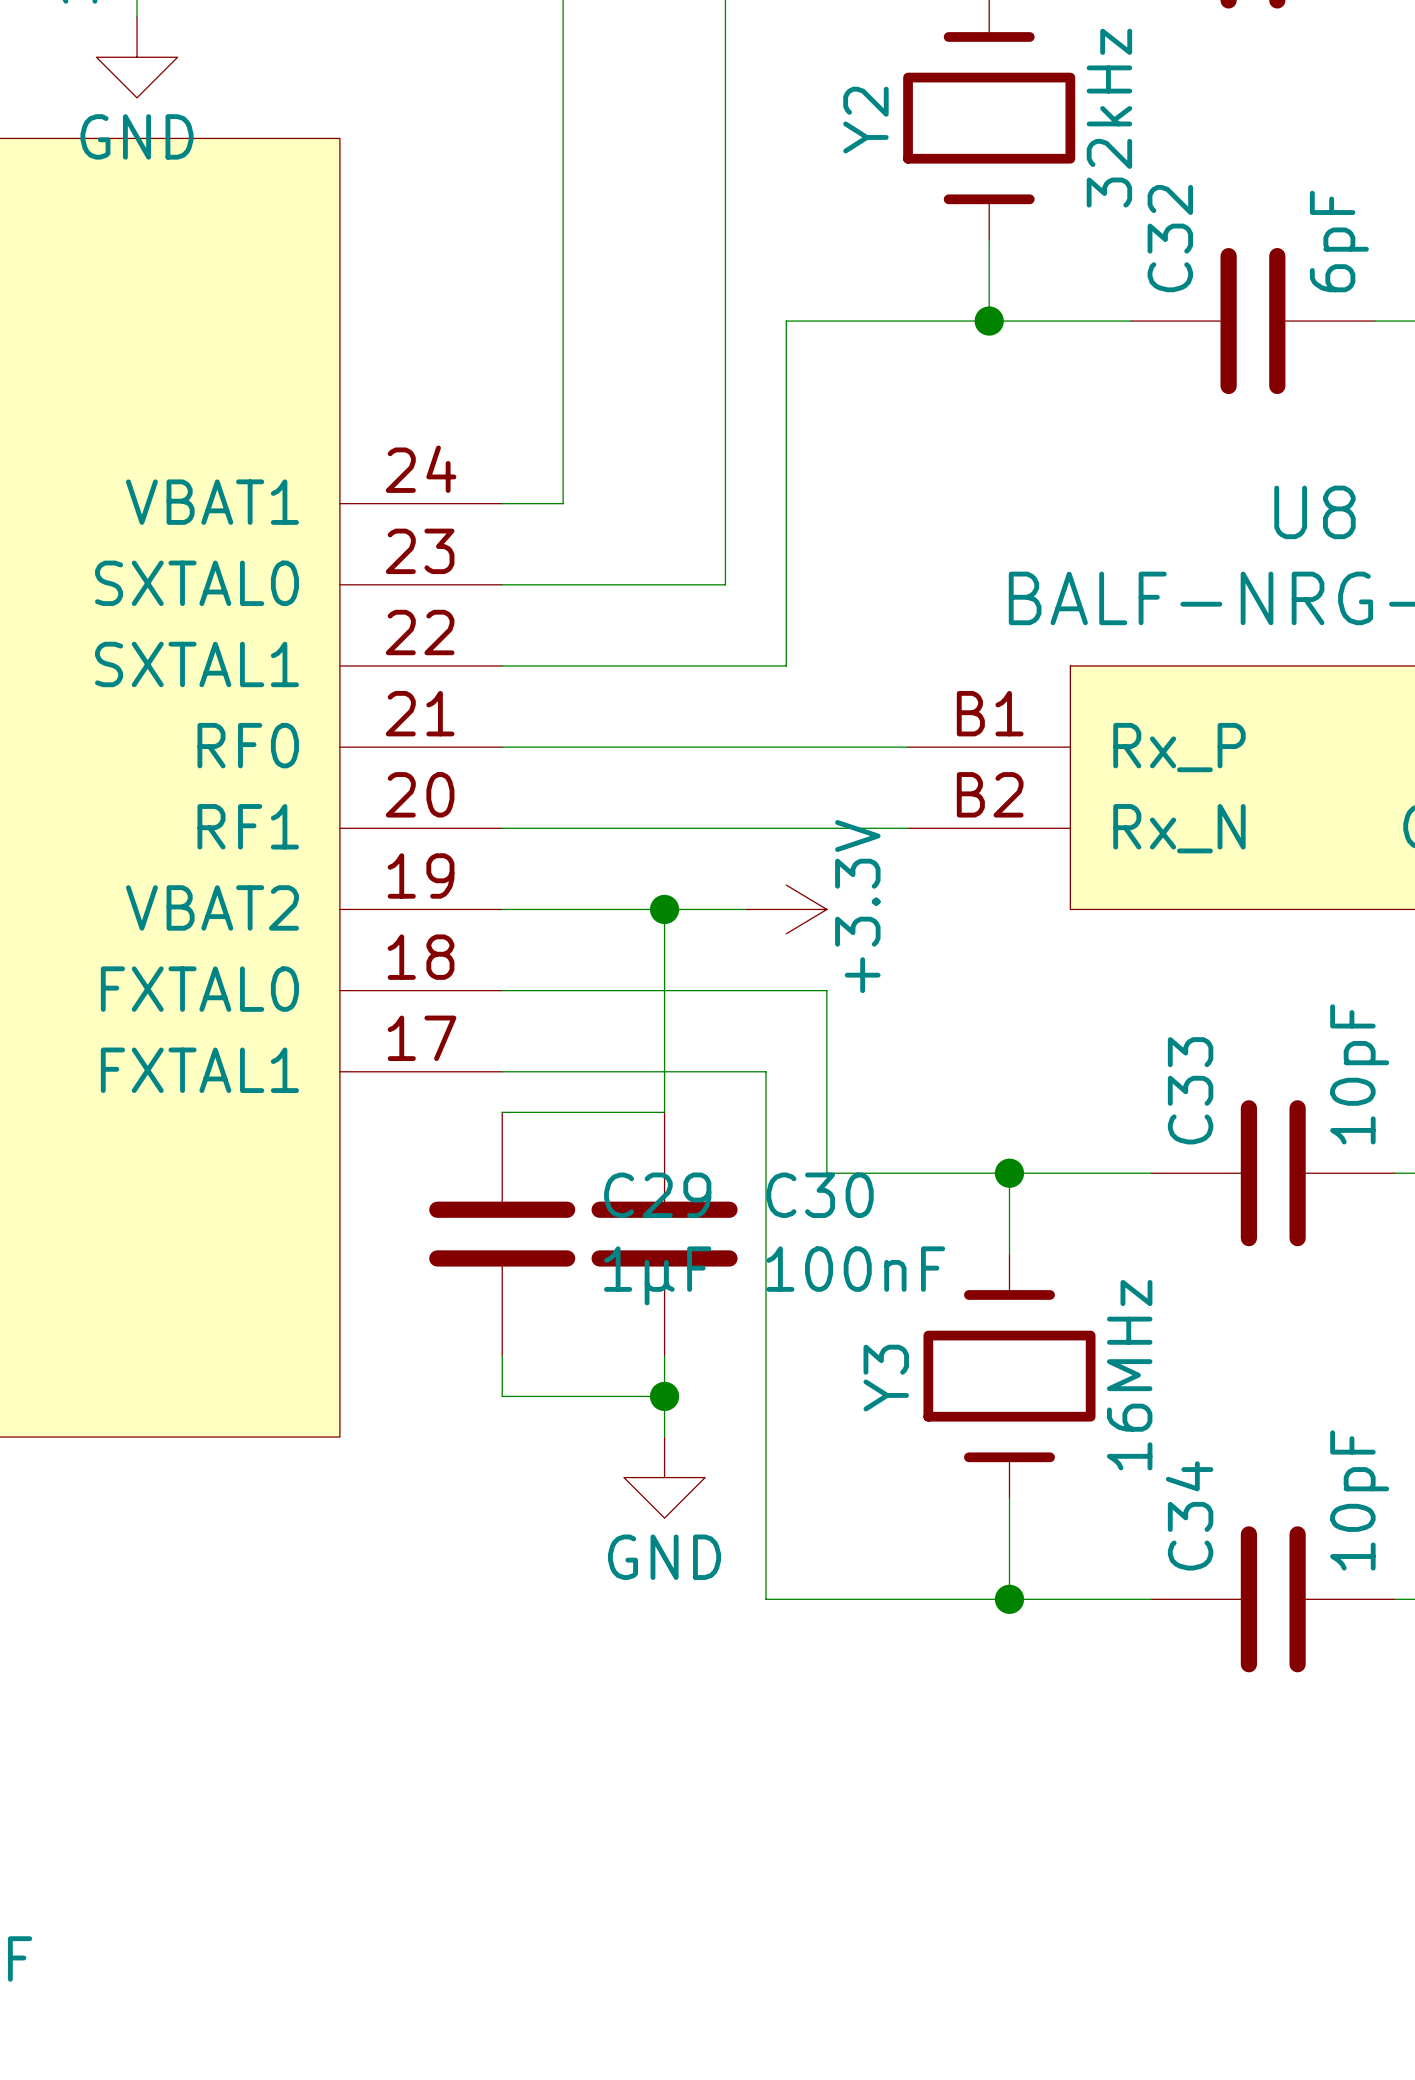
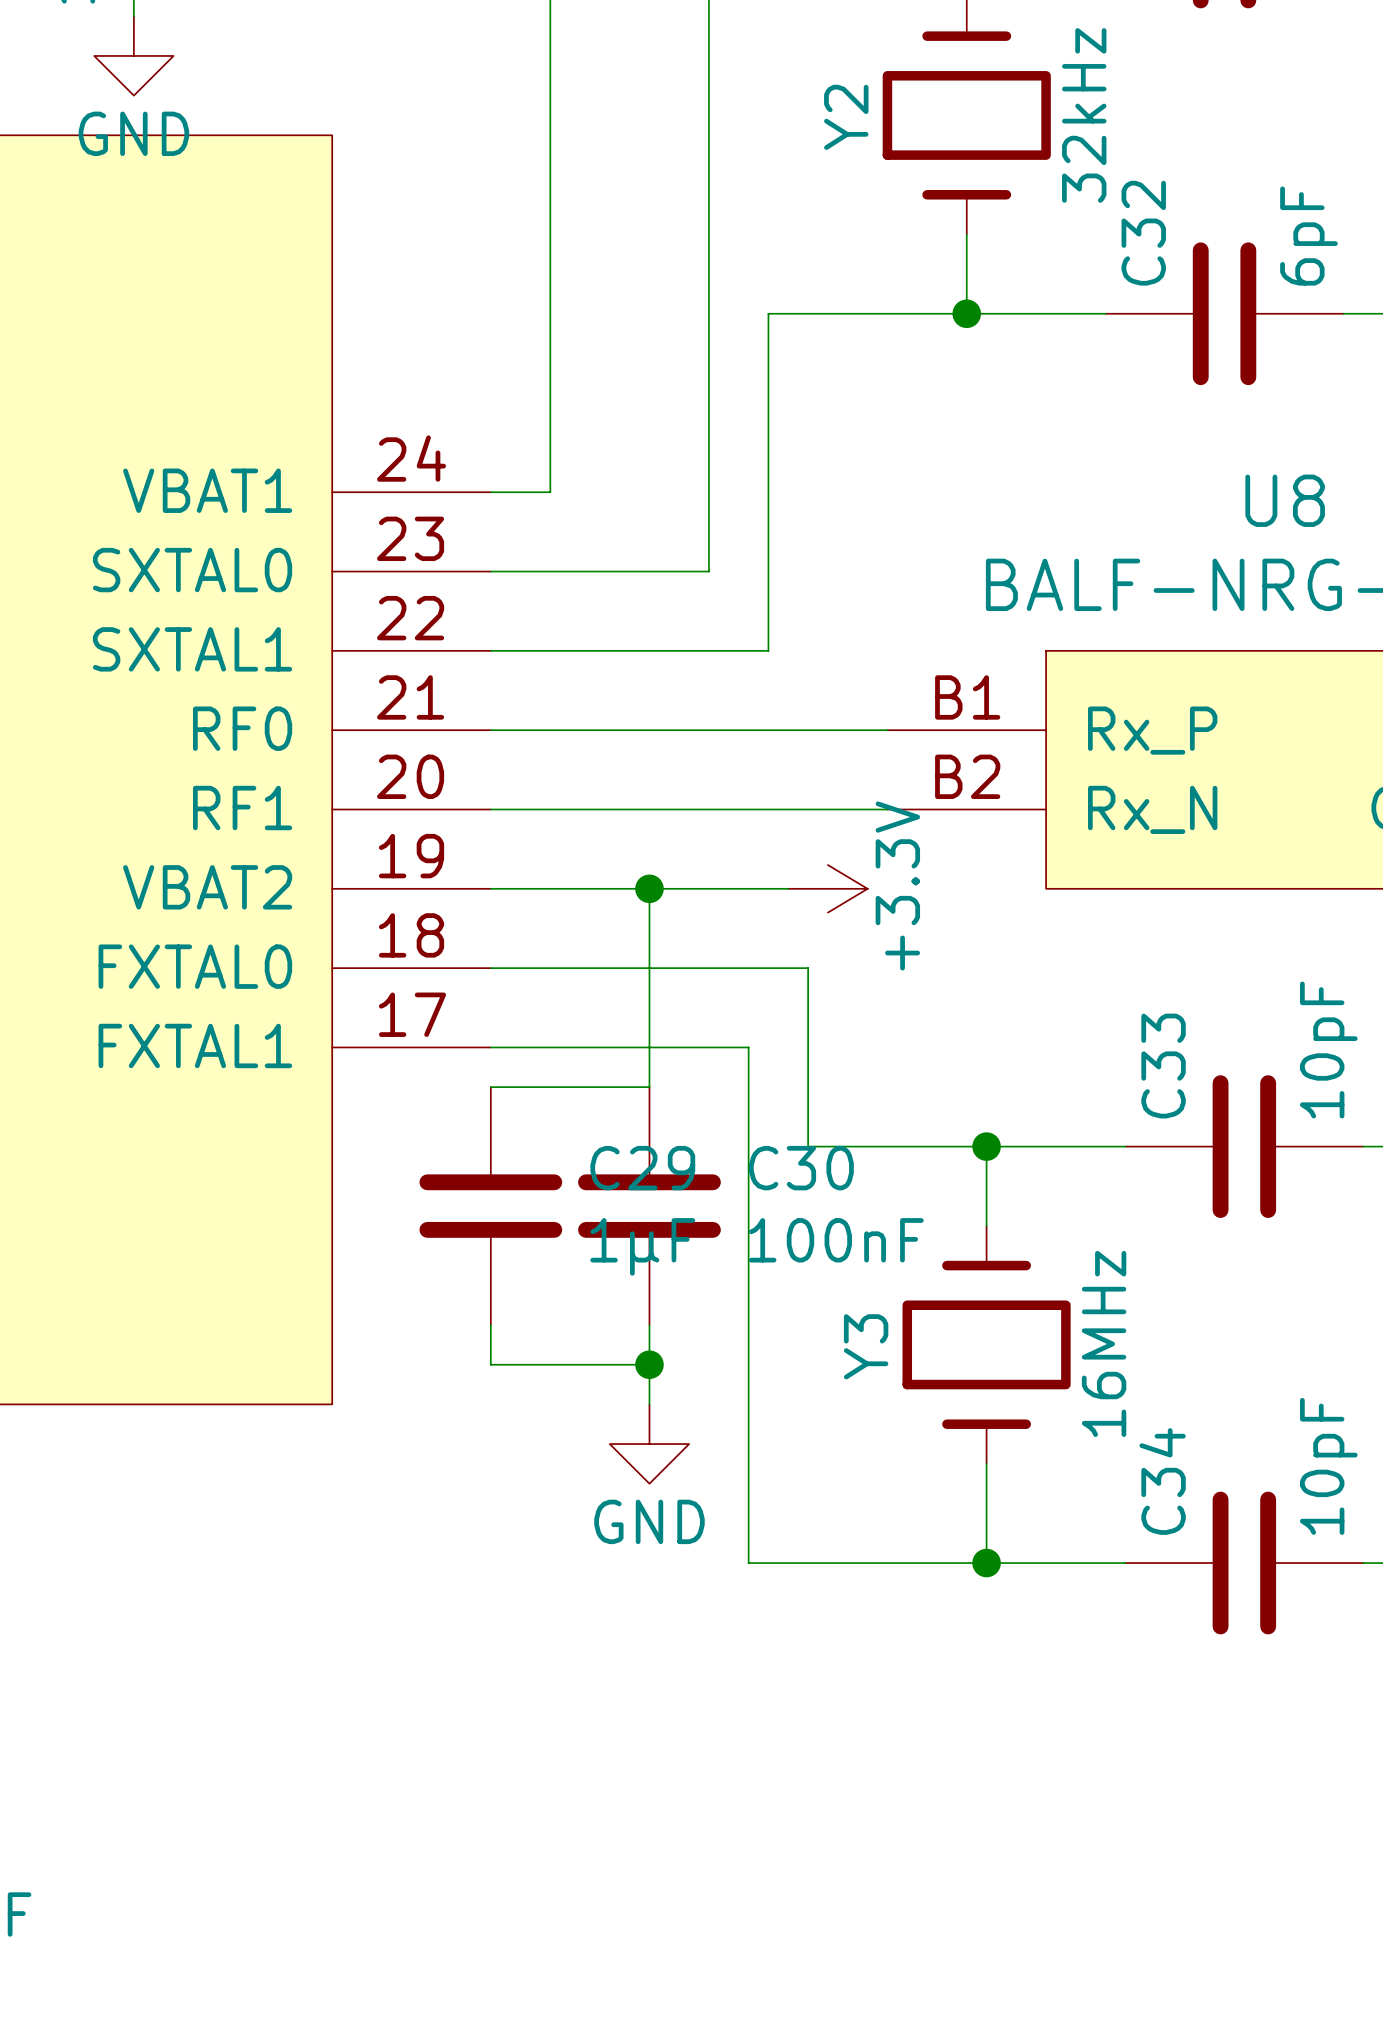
power symbol position: +3.3V (786, 909) -> +3.3V (827, 888)

